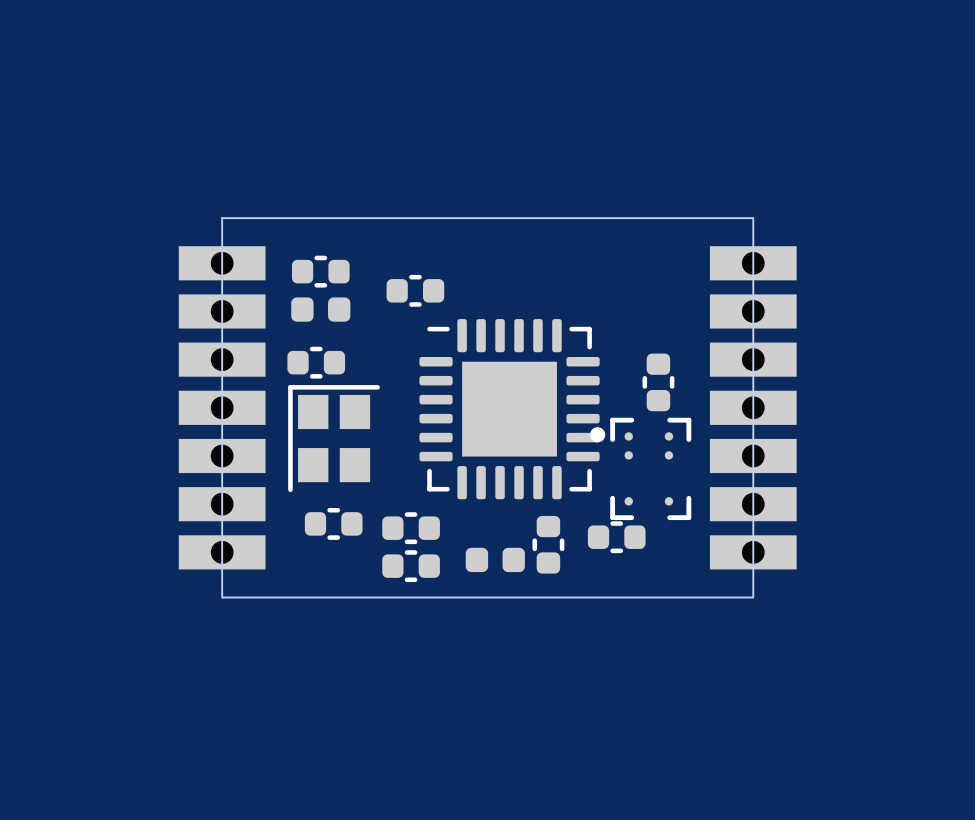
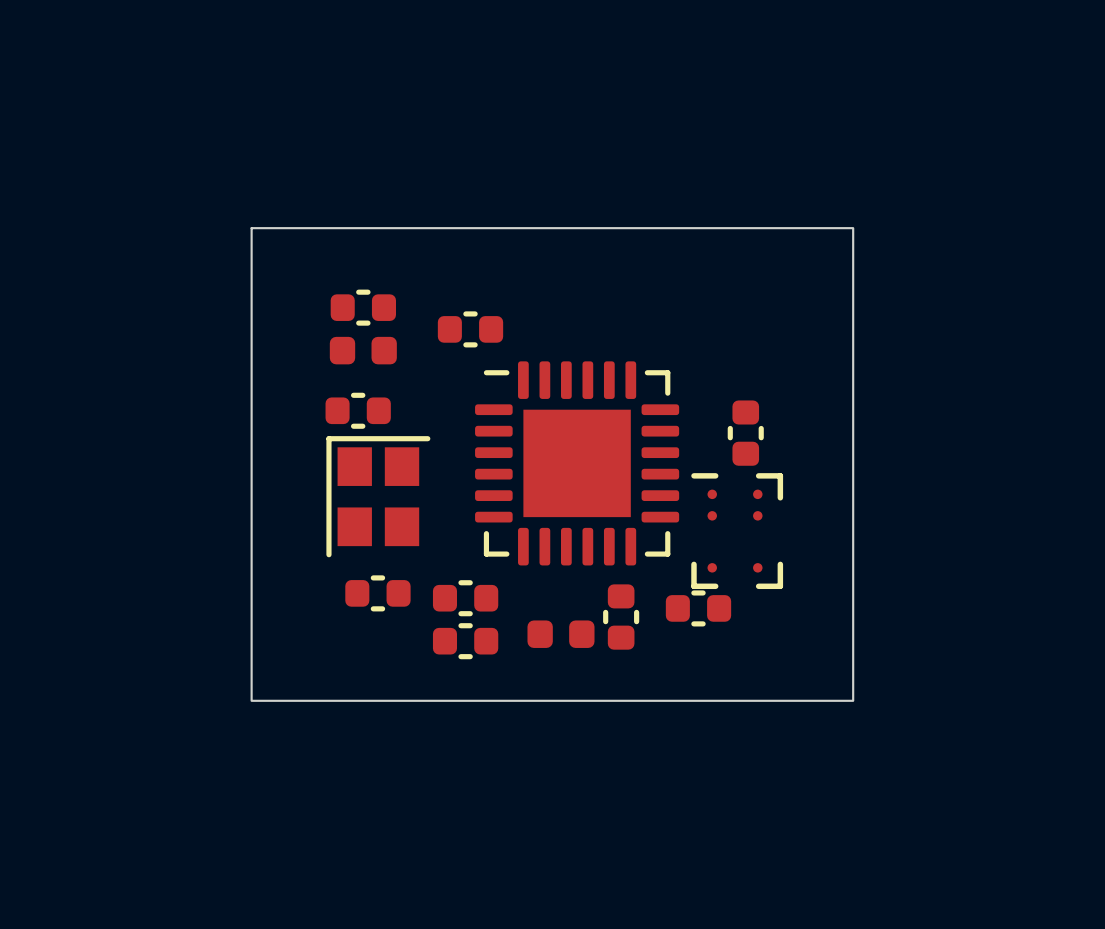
part footprint: [178, 217, 797, 599] -> [250, 227, 855, 702]
part footprint: [590, 417, 692, 521] -> [691, 473, 784, 590]

